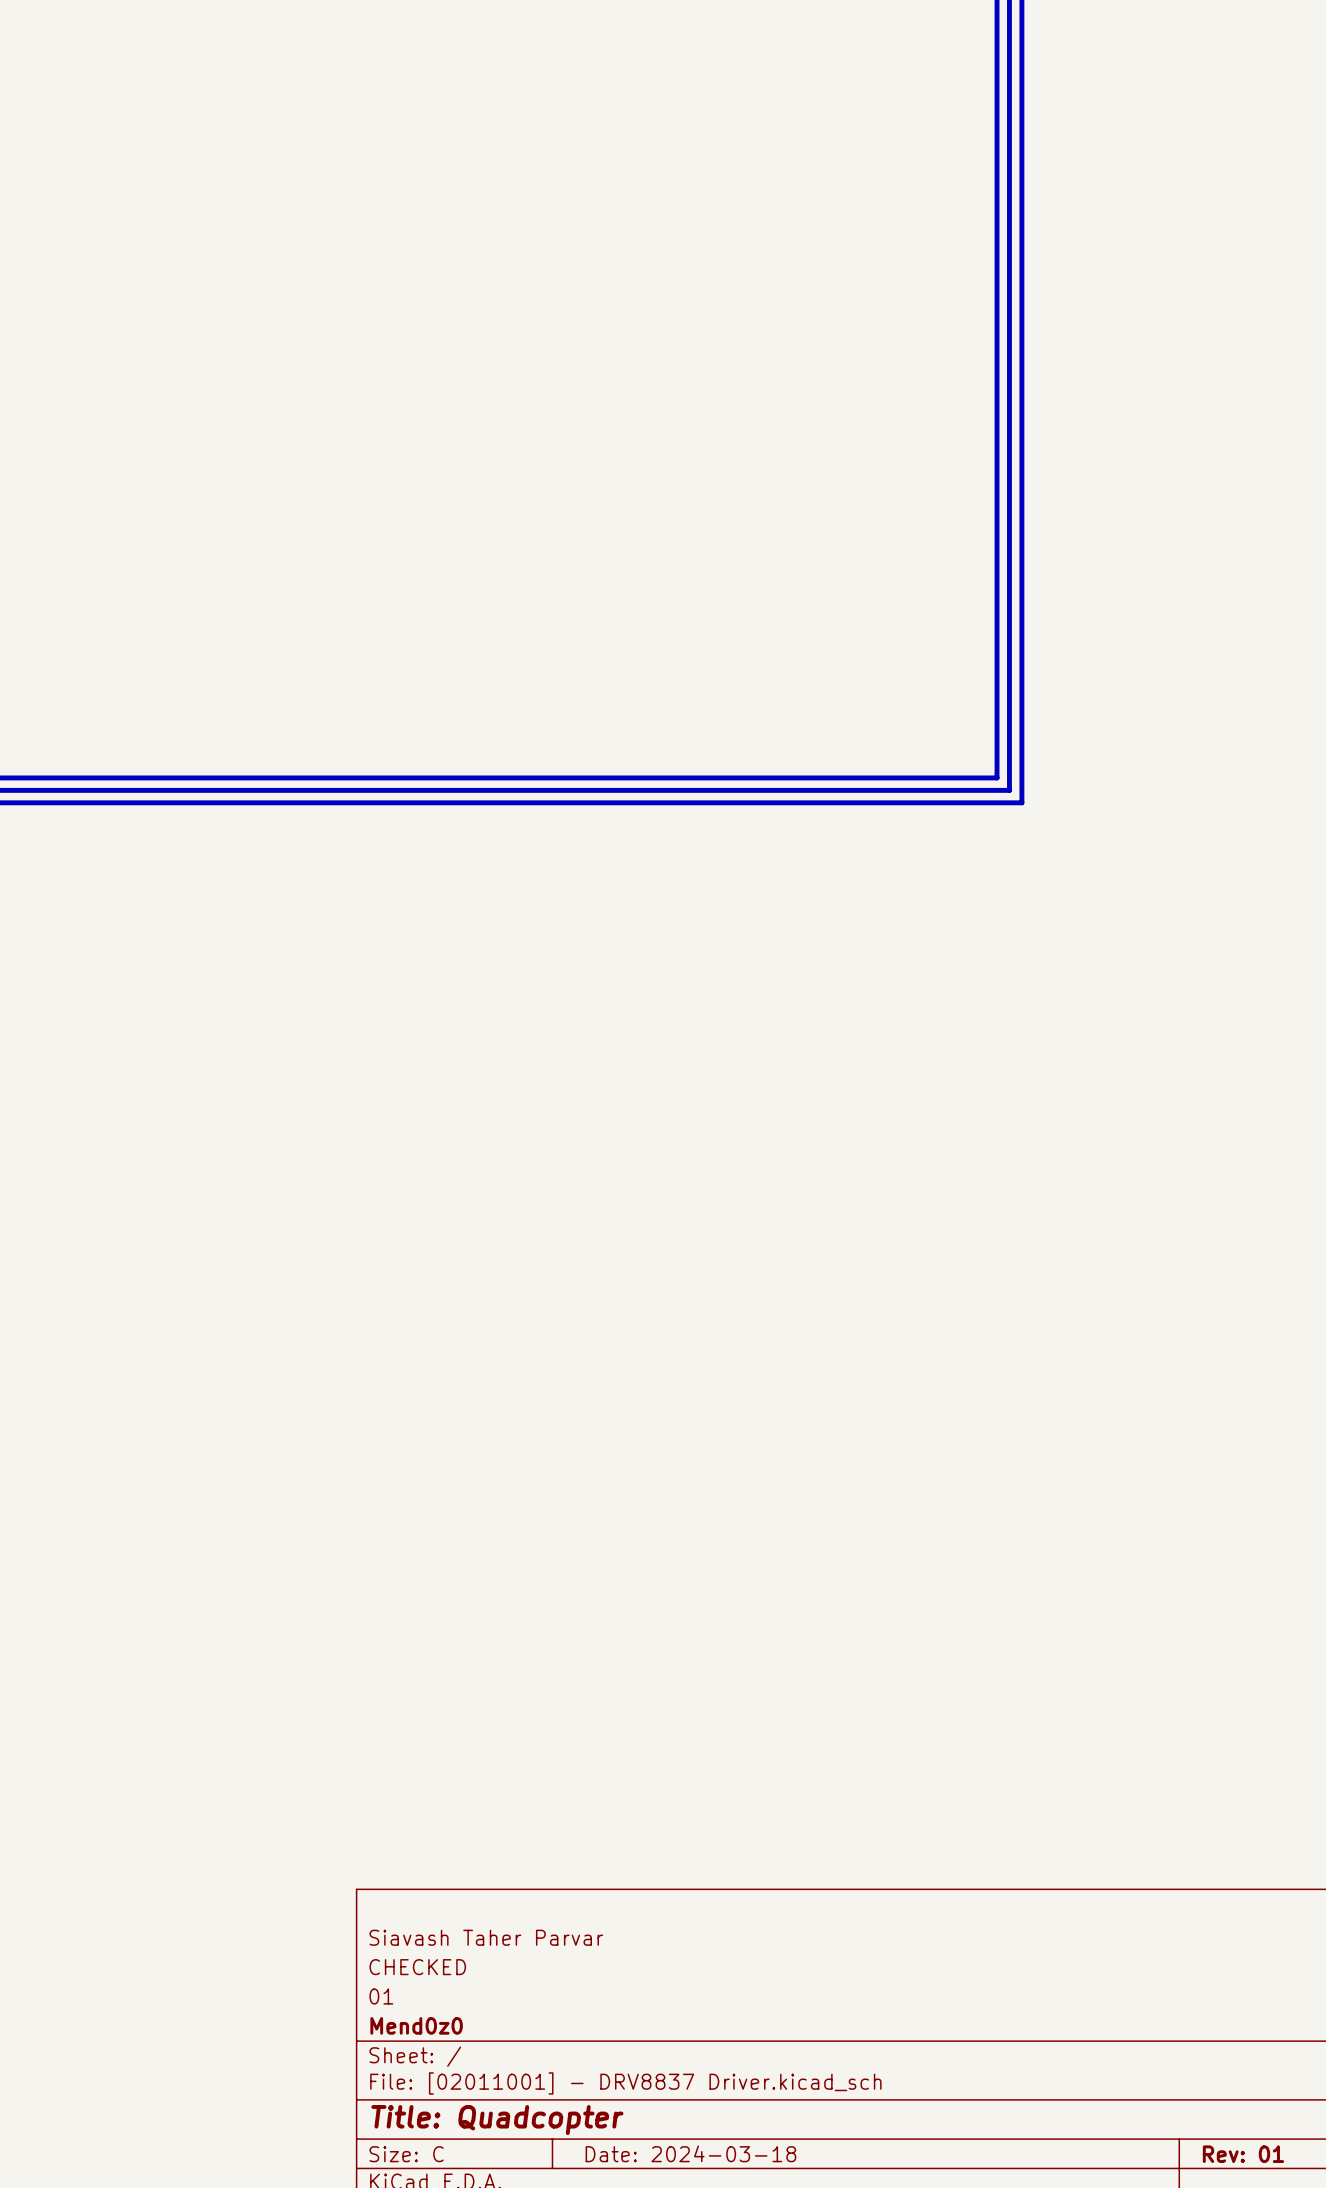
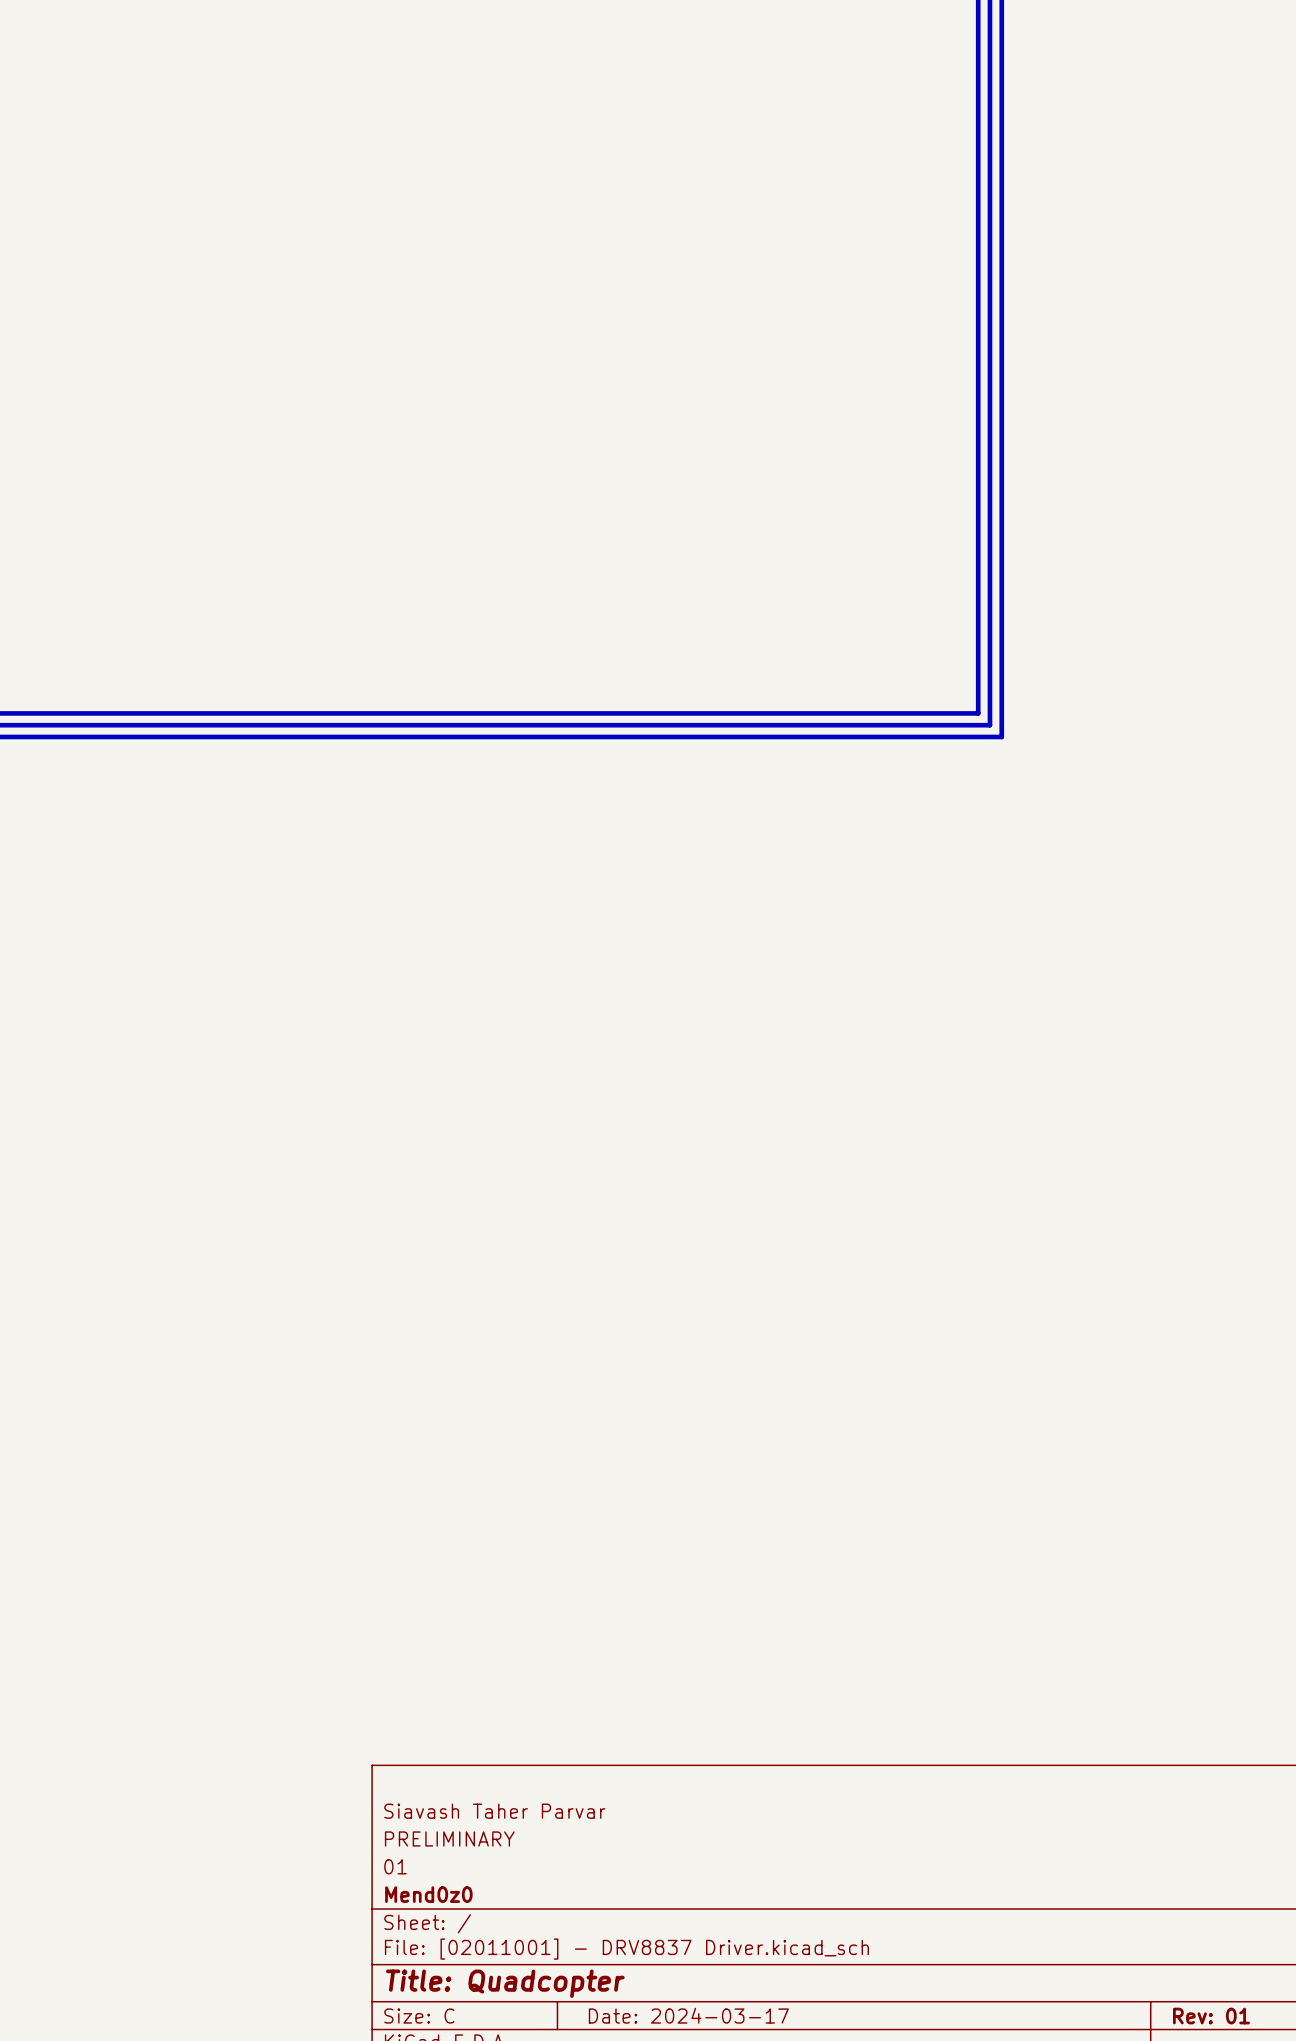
title block: CHECKED (417, 1967) -> PRELIMINARY (449, 1838)
title block: Date: 2024-03-18 (690, 2153) -> Date: 2024-03-17 (688, 2015)

